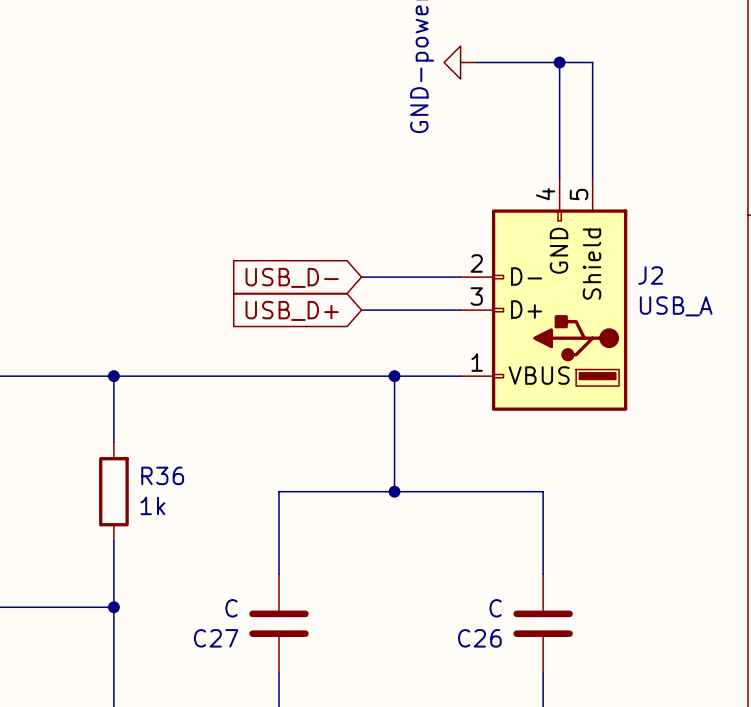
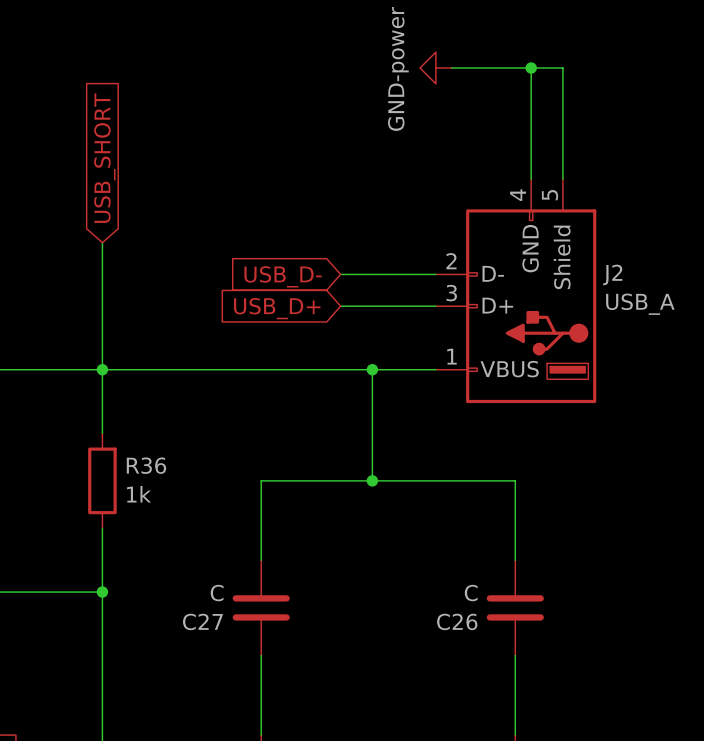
global label: none -> USB_SHORT (104, 158)
wire: none -> (102, 242) (102, 369)

